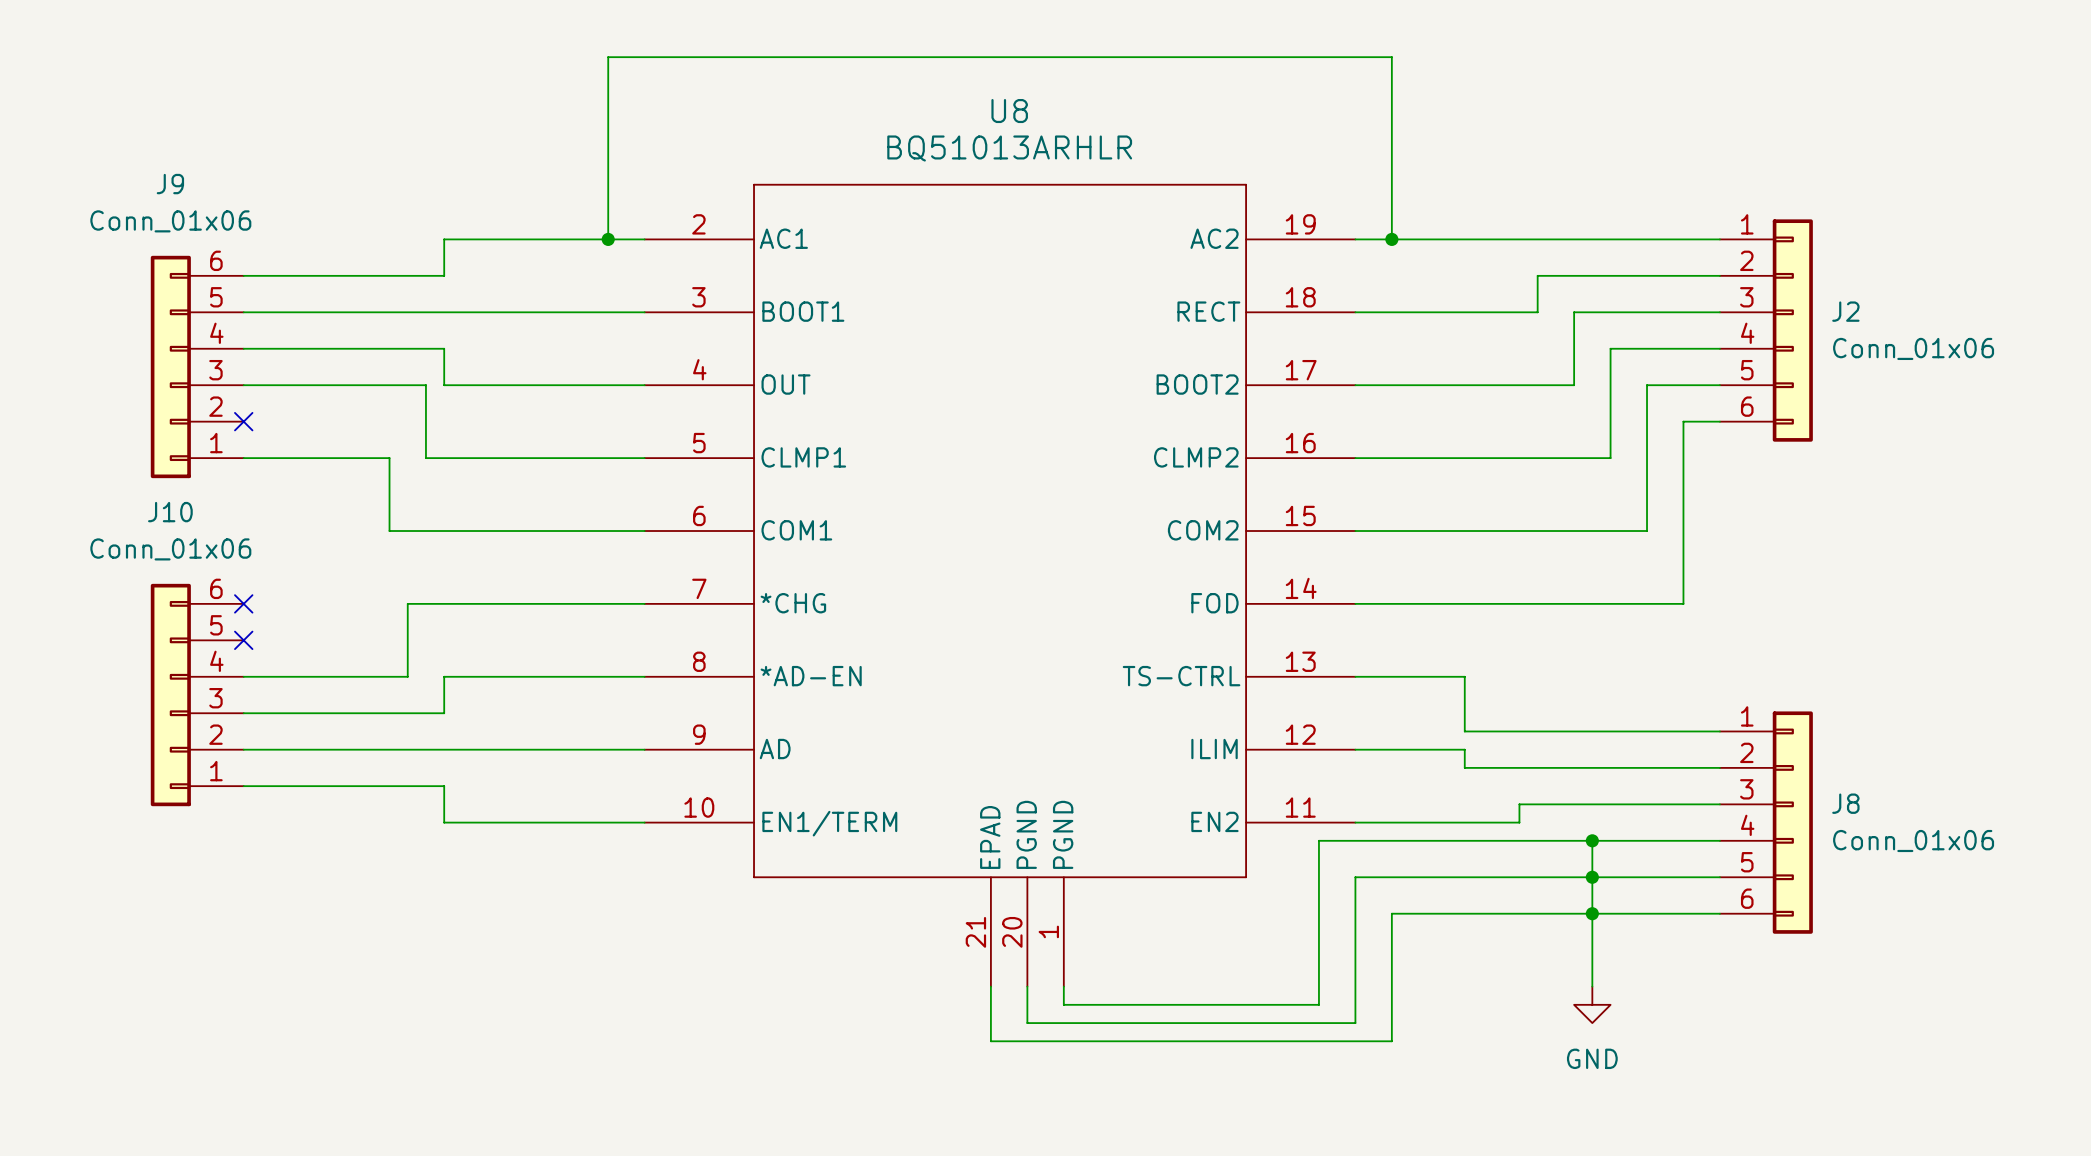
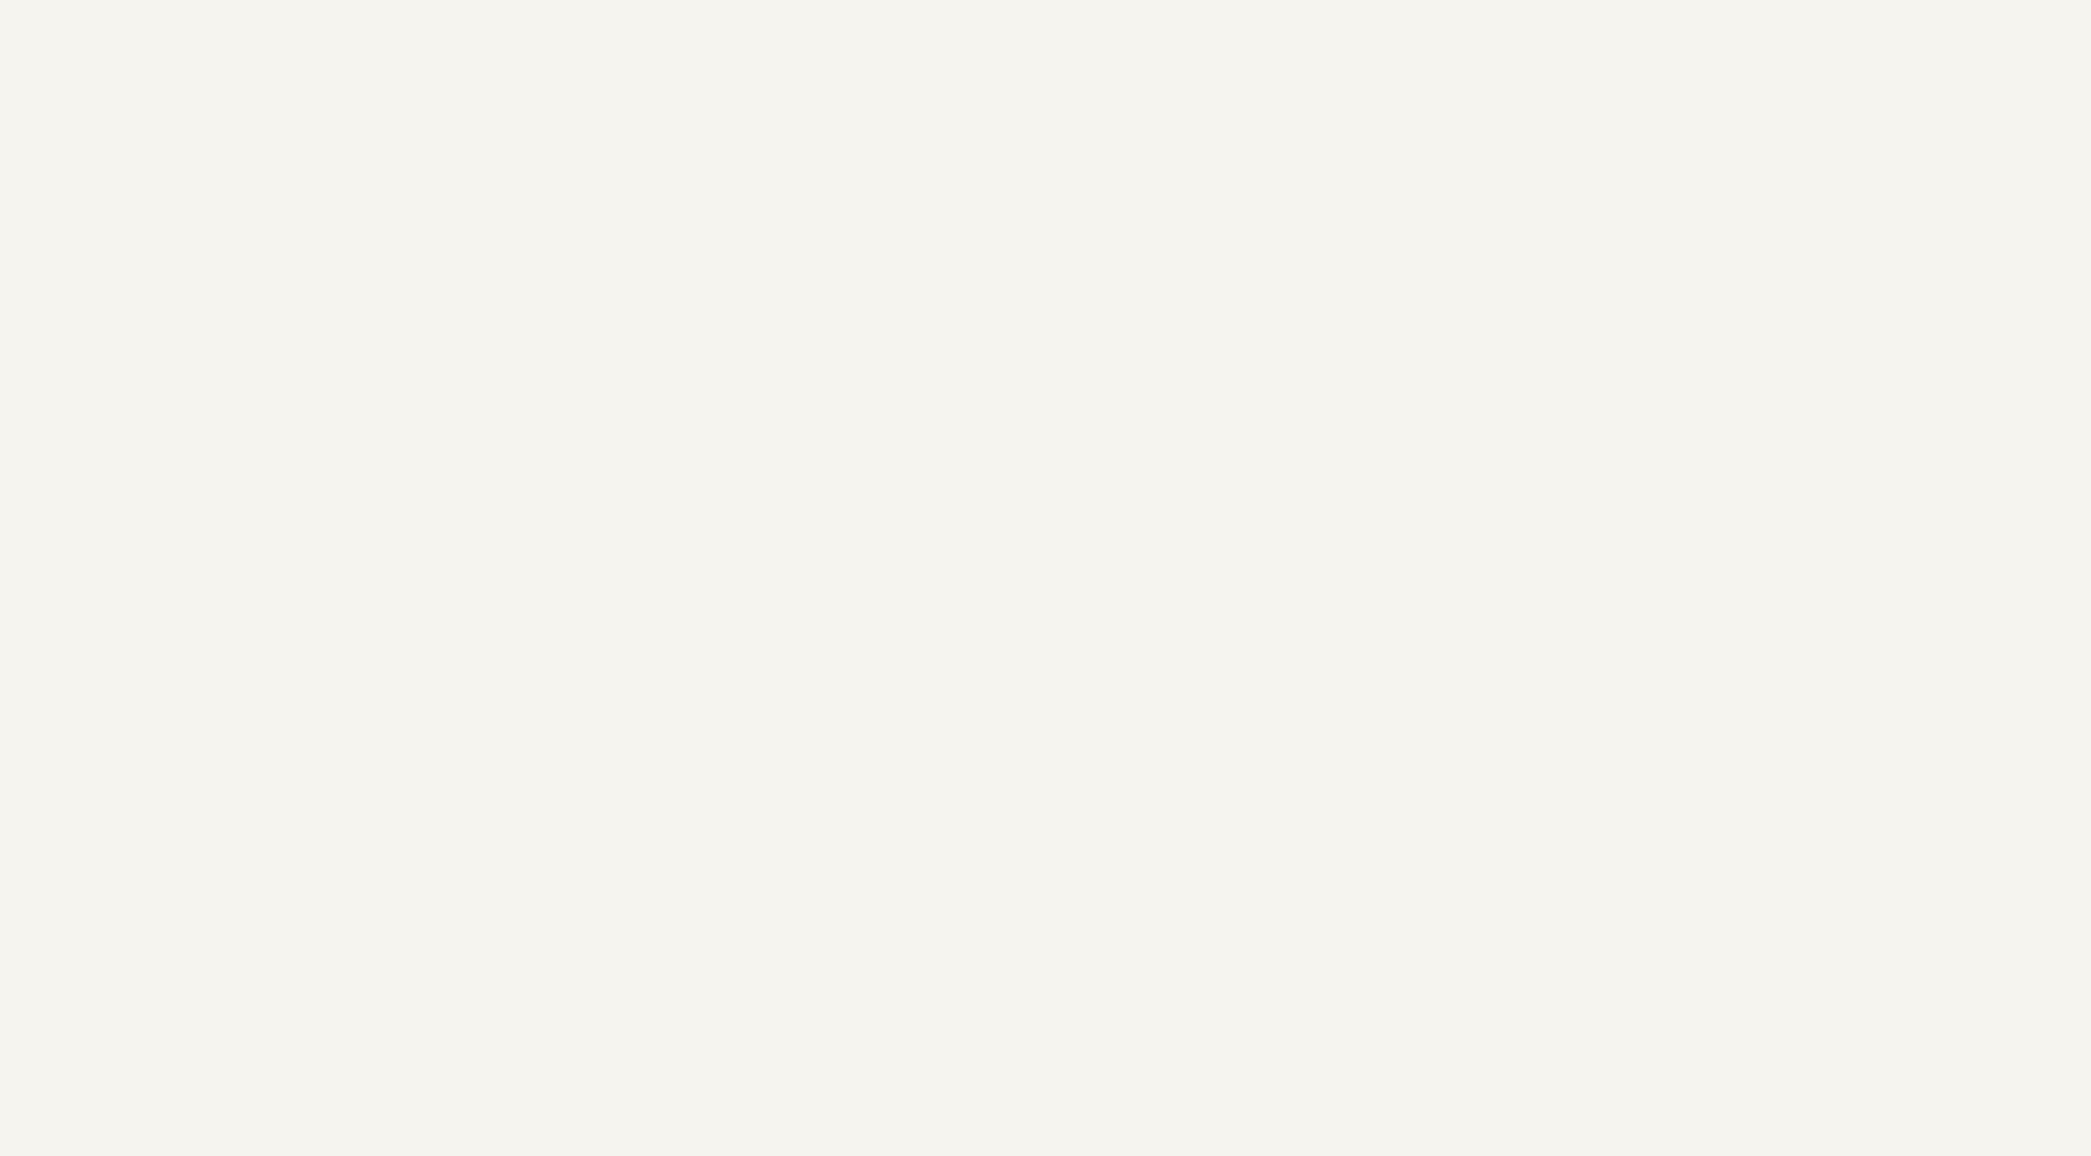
wire: (608, 239) (608, 57) (1391, 57) (1391, 239) -> none
junction: (608, 239) -> none
wire: (644, 239) (444, 239) (444, 275) (243, 275) -> none
wire: (1355, 239) (1719, 239) -> none
junction: (1391, 239) -> none
wire: (1719, 275) (1537, 275) (1537, 312) (1355, 312) -> none
wire: (243, 312) (644, 312) -> none
wire: (1719, 312) (1574, 312) (1574, 385) (1355, 385) -> none
J2: Conn_01x06 (1766, 330) -> none
wire: (243, 348) (444, 348) (444, 385) (644, 385) -> none
wire: (1719, 348) (1610, 348) (1610, 458) (1355, 458) -> none
J9: Conn_01x06 (197, 366) -> none
wire: (243, 385) (425, 385) (425, 458) (644, 458) -> none
wire: (1719, 385) (1647, 385) (1647, 531) (1355, 531) -> none
no-connect mark: (243, 421) -> none
wire: (1719, 421) (1683, 421) (1683, 603) (1355, 603) -> none
wire: (243, 458) (389, 458) (389, 531) (644, 531) -> none
U8: BQ51013ARHLR (1000, 585) -> none
no-connect mark: (243, 603) -> none
wire: (644, 603) (407, 603) (407, 676) (243, 676) -> none
no-connect mark: (243, 640) -> none
wire: (644, 676) (444, 676) (444, 713) (243, 713) -> none
wire: (1355, 676) (1464, 676) (1464, 731) (1719, 731) -> none
J10: Conn_01x06 (197, 695) -> none
wire: (243, 749) (644, 749) -> none
wire: (1355, 749) (1464, 749) (1464, 767) (1719, 767) -> none
wire: (243, 786) (444, 786) (444, 822) (644, 822) -> none
wire: (1719, 804) (1519, 804) (1519, 822) (1355, 822) -> none
J8: Conn_01x06 (1766, 822) -> none
wire: (1592, 840) (1592, 986) -> none
junction: (1592, 840) -> none
wire: (1719, 840) (1318, 840) (1318, 1004) (1063, 1004) (1063, 986) -> none
junction: (1592, 877) -> none
wire: (1719, 877) (1355, 877) (1355, 1023) (1027, 1023) (1027, 986) -> none
junction: (1592, 913) -> none
wire: (1719, 913) (1391, 913) (1391, 1041) (990, 1041) (990, 986) -> none
power symbol: GND (1592, 1004) -> none

